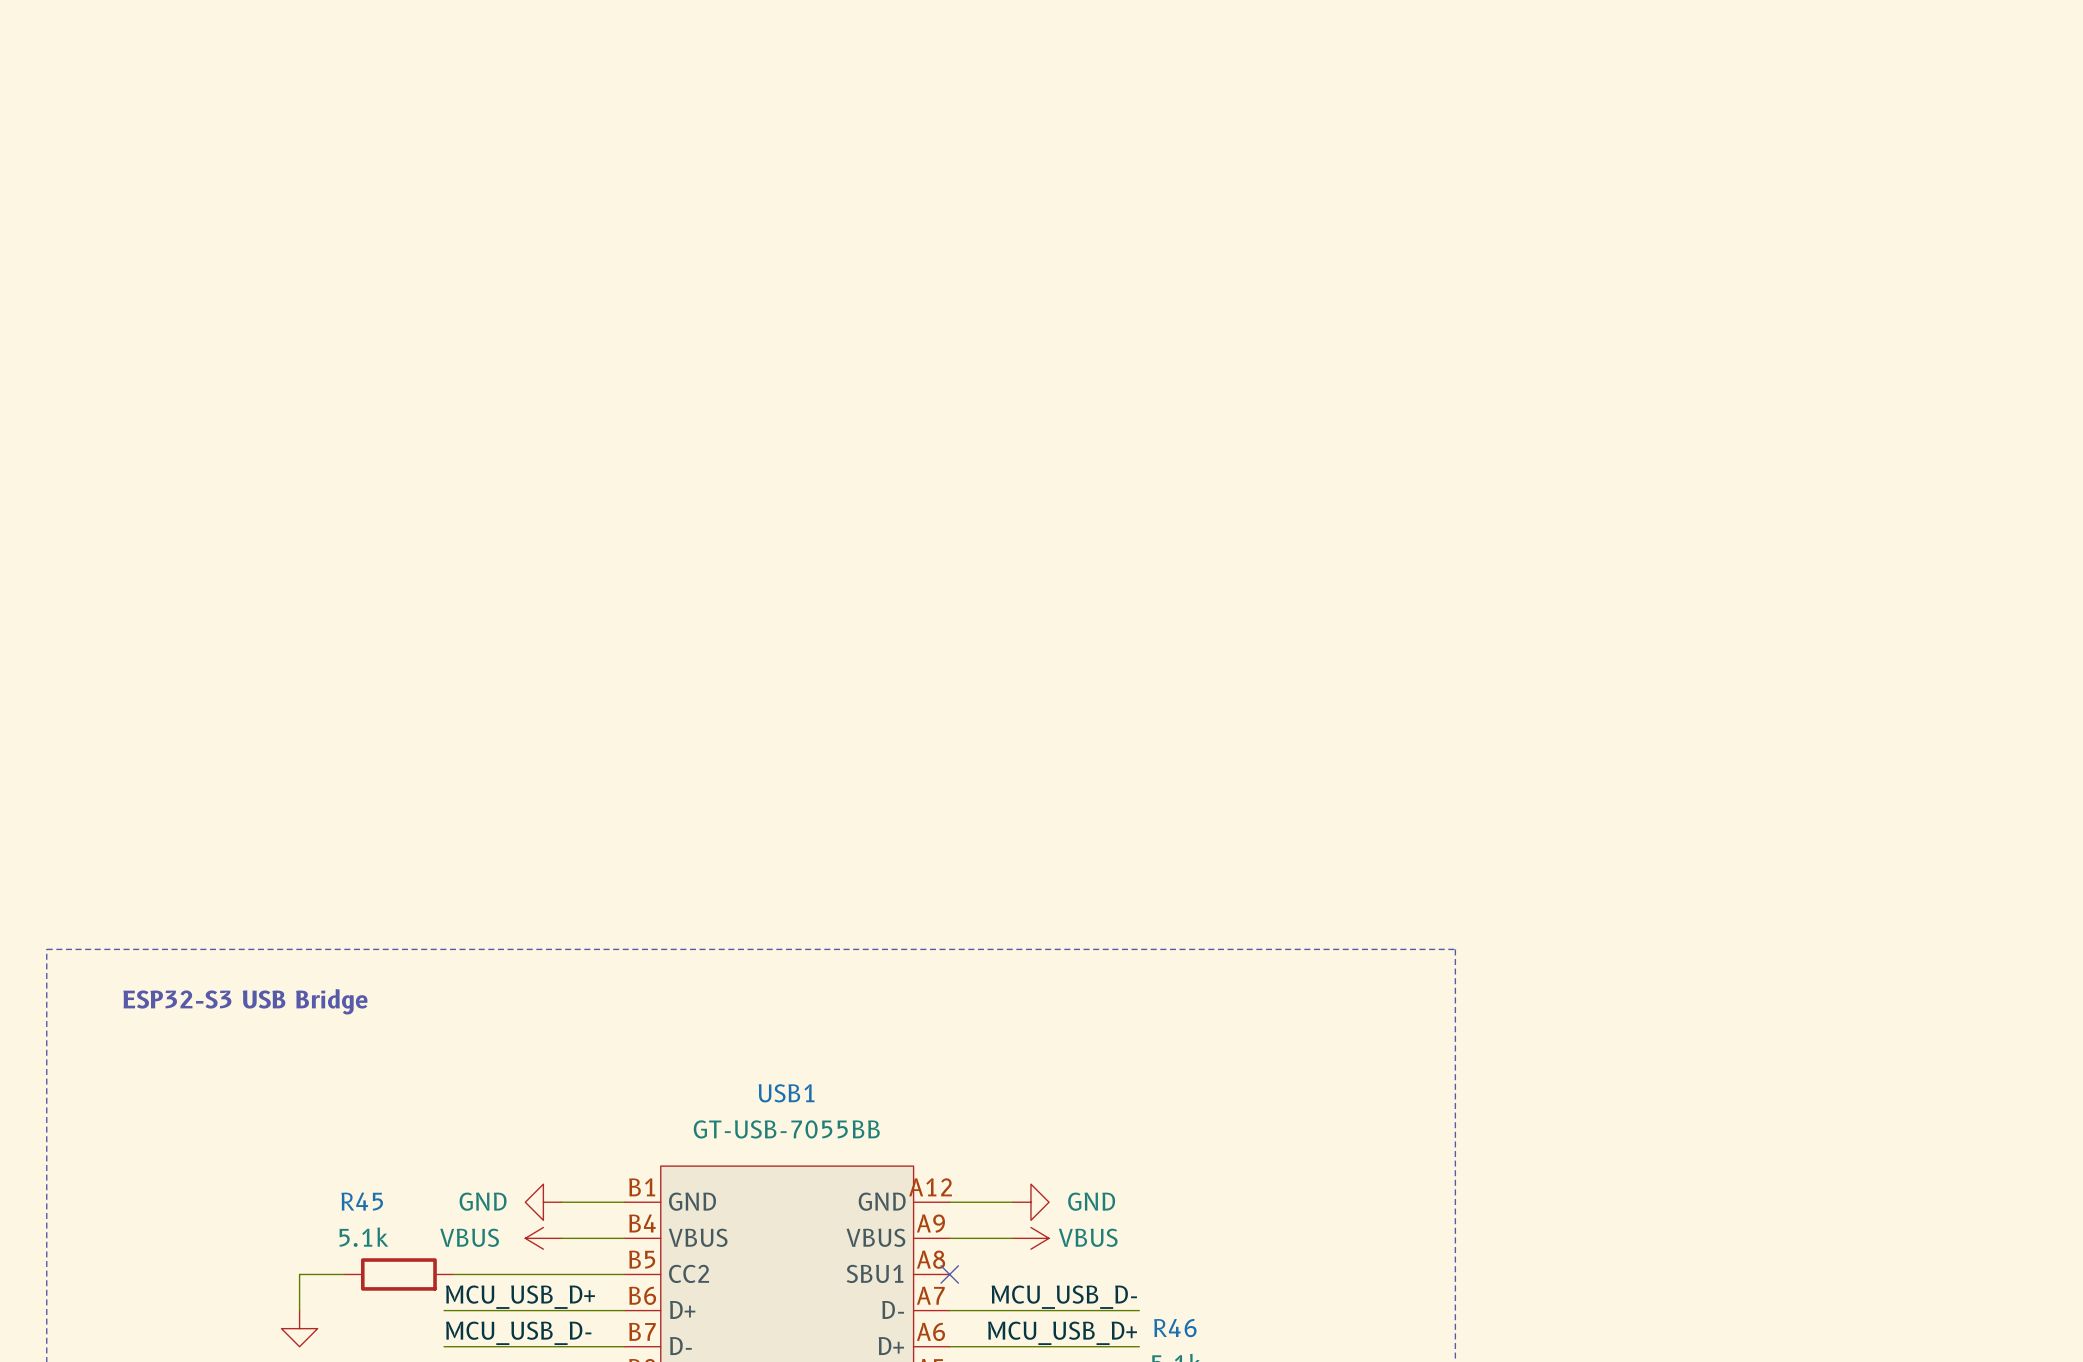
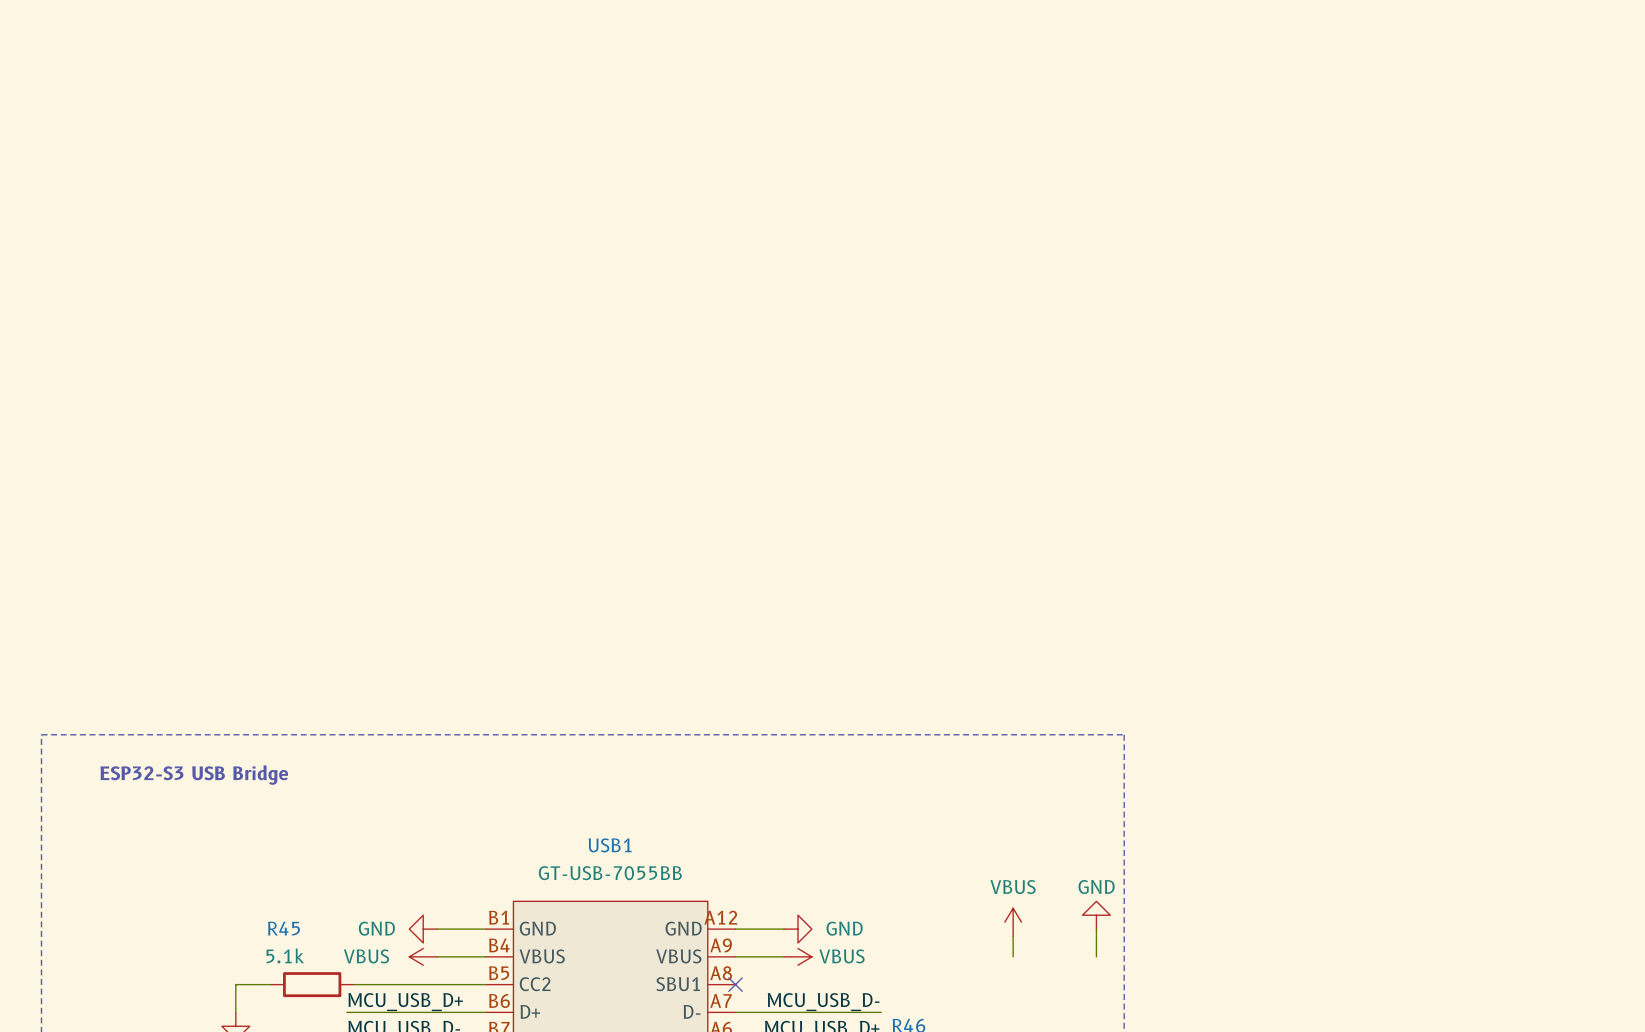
power symbol: none -> GND (1096, 915)
power symbol: none -> VBUS (1013, 922)
wire: none -> (1096, 929) (1096, 956)
wire: none -> (1013, 936) (1013, 956)

